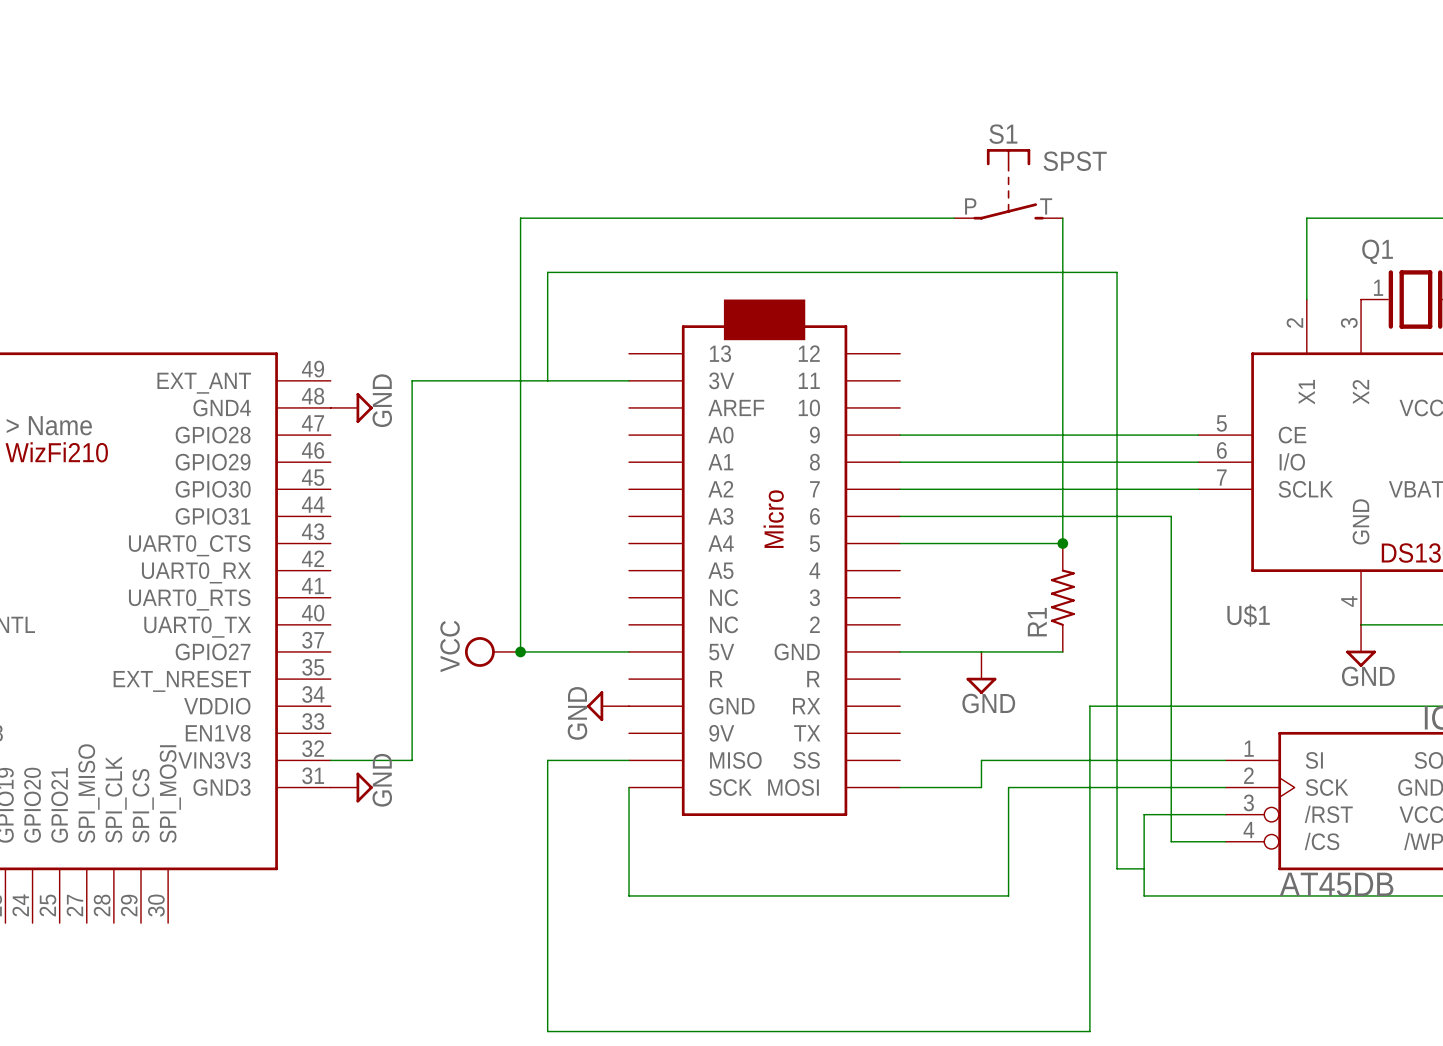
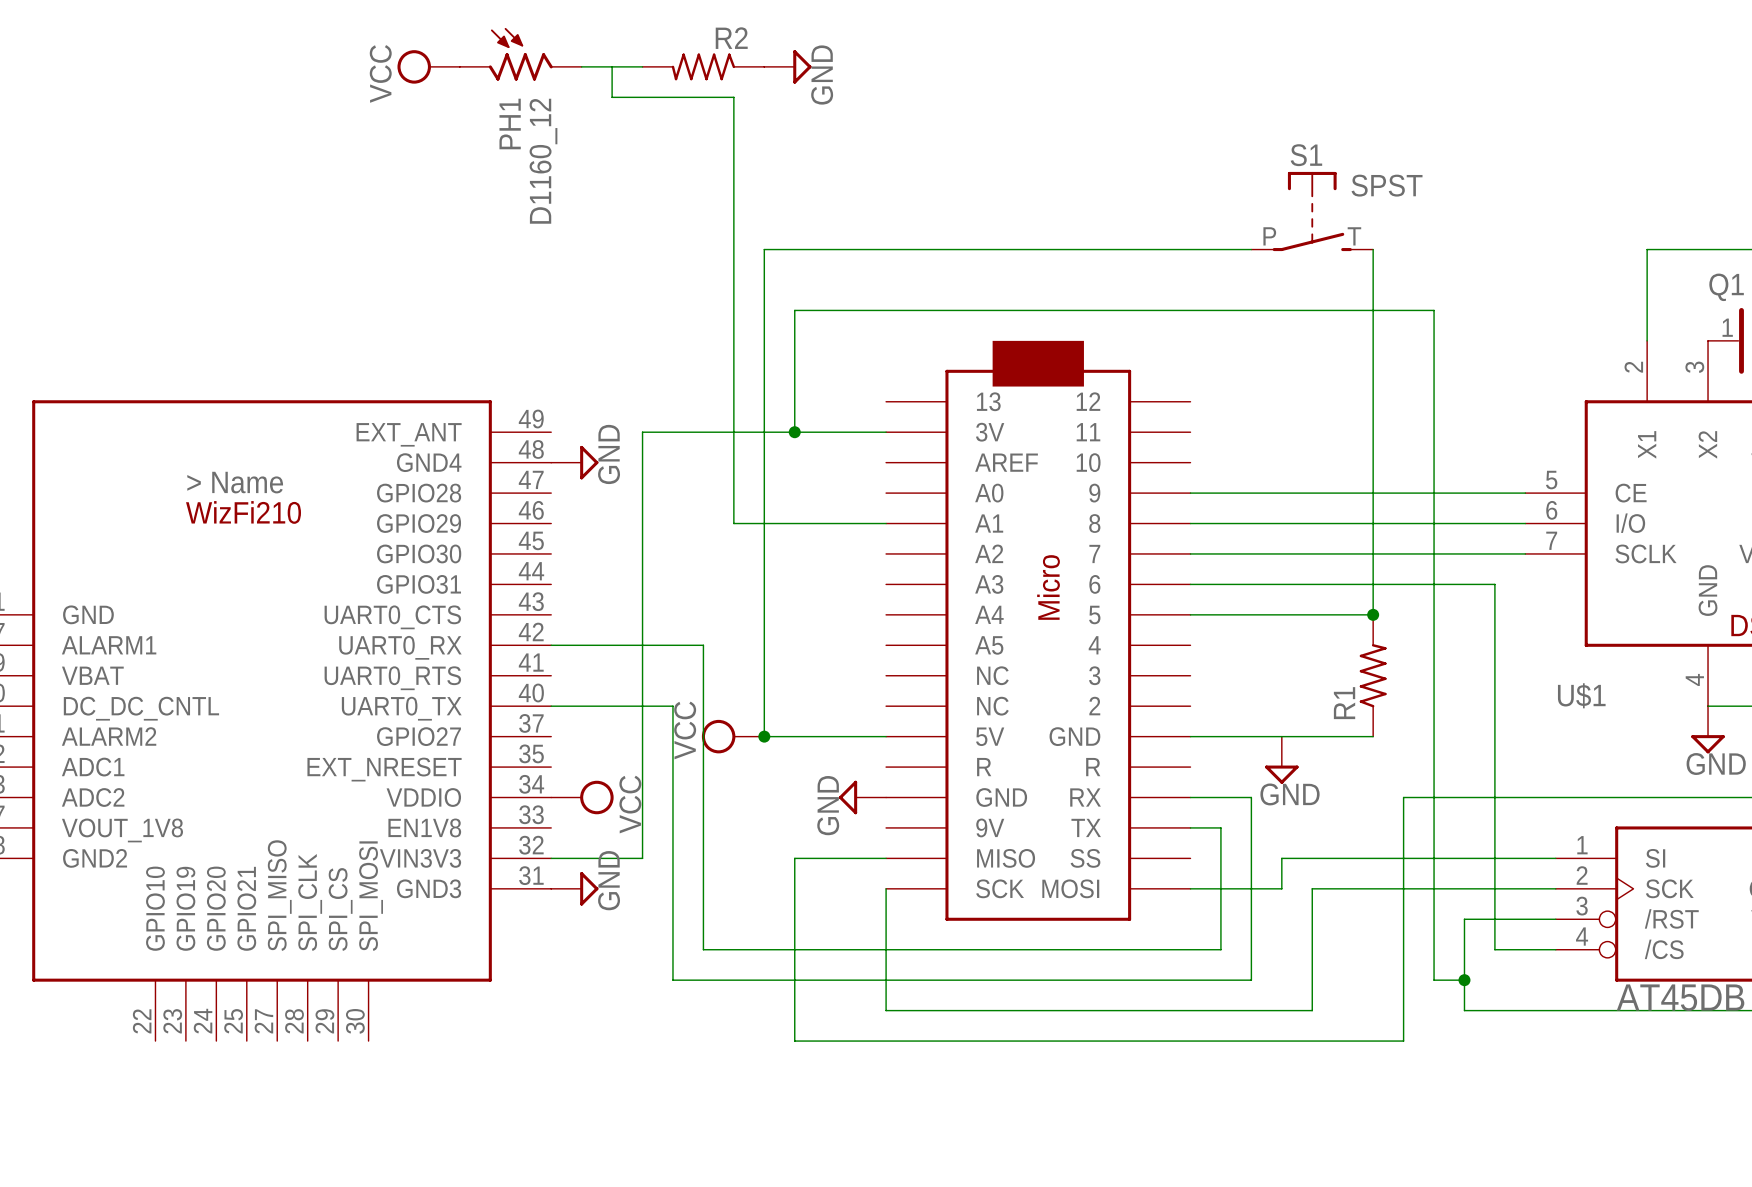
PH1: none -> D1160_12 (520, 54)
power symbol: none -> VCC (428, 66)
wire: none -> (581, 66) (642, 66)
wire: none -> (612, 66) (612, 97) (733, 97) (733, 523) (886, 523)
R2: none -> (703, 66)
power symbol: none -> GND (787, 66)
junction: none -> (794, 432)
wire: none -> (551, 645) (703, 645) (703, 949) (1220, 949) (1220, 827) (1190, 827)
wire: none -> (551, 706) (672, 706) (672, 980) (1251, 980) (1251, 797) (1190, 797)
power symbol: none -> VCC (582, 797)
junction: none -> (1464, 980)
wire: (547, 923) (547, 1031) (1089, 1031) (1089, 923) -> (794, 1041) (1403, 1041)

